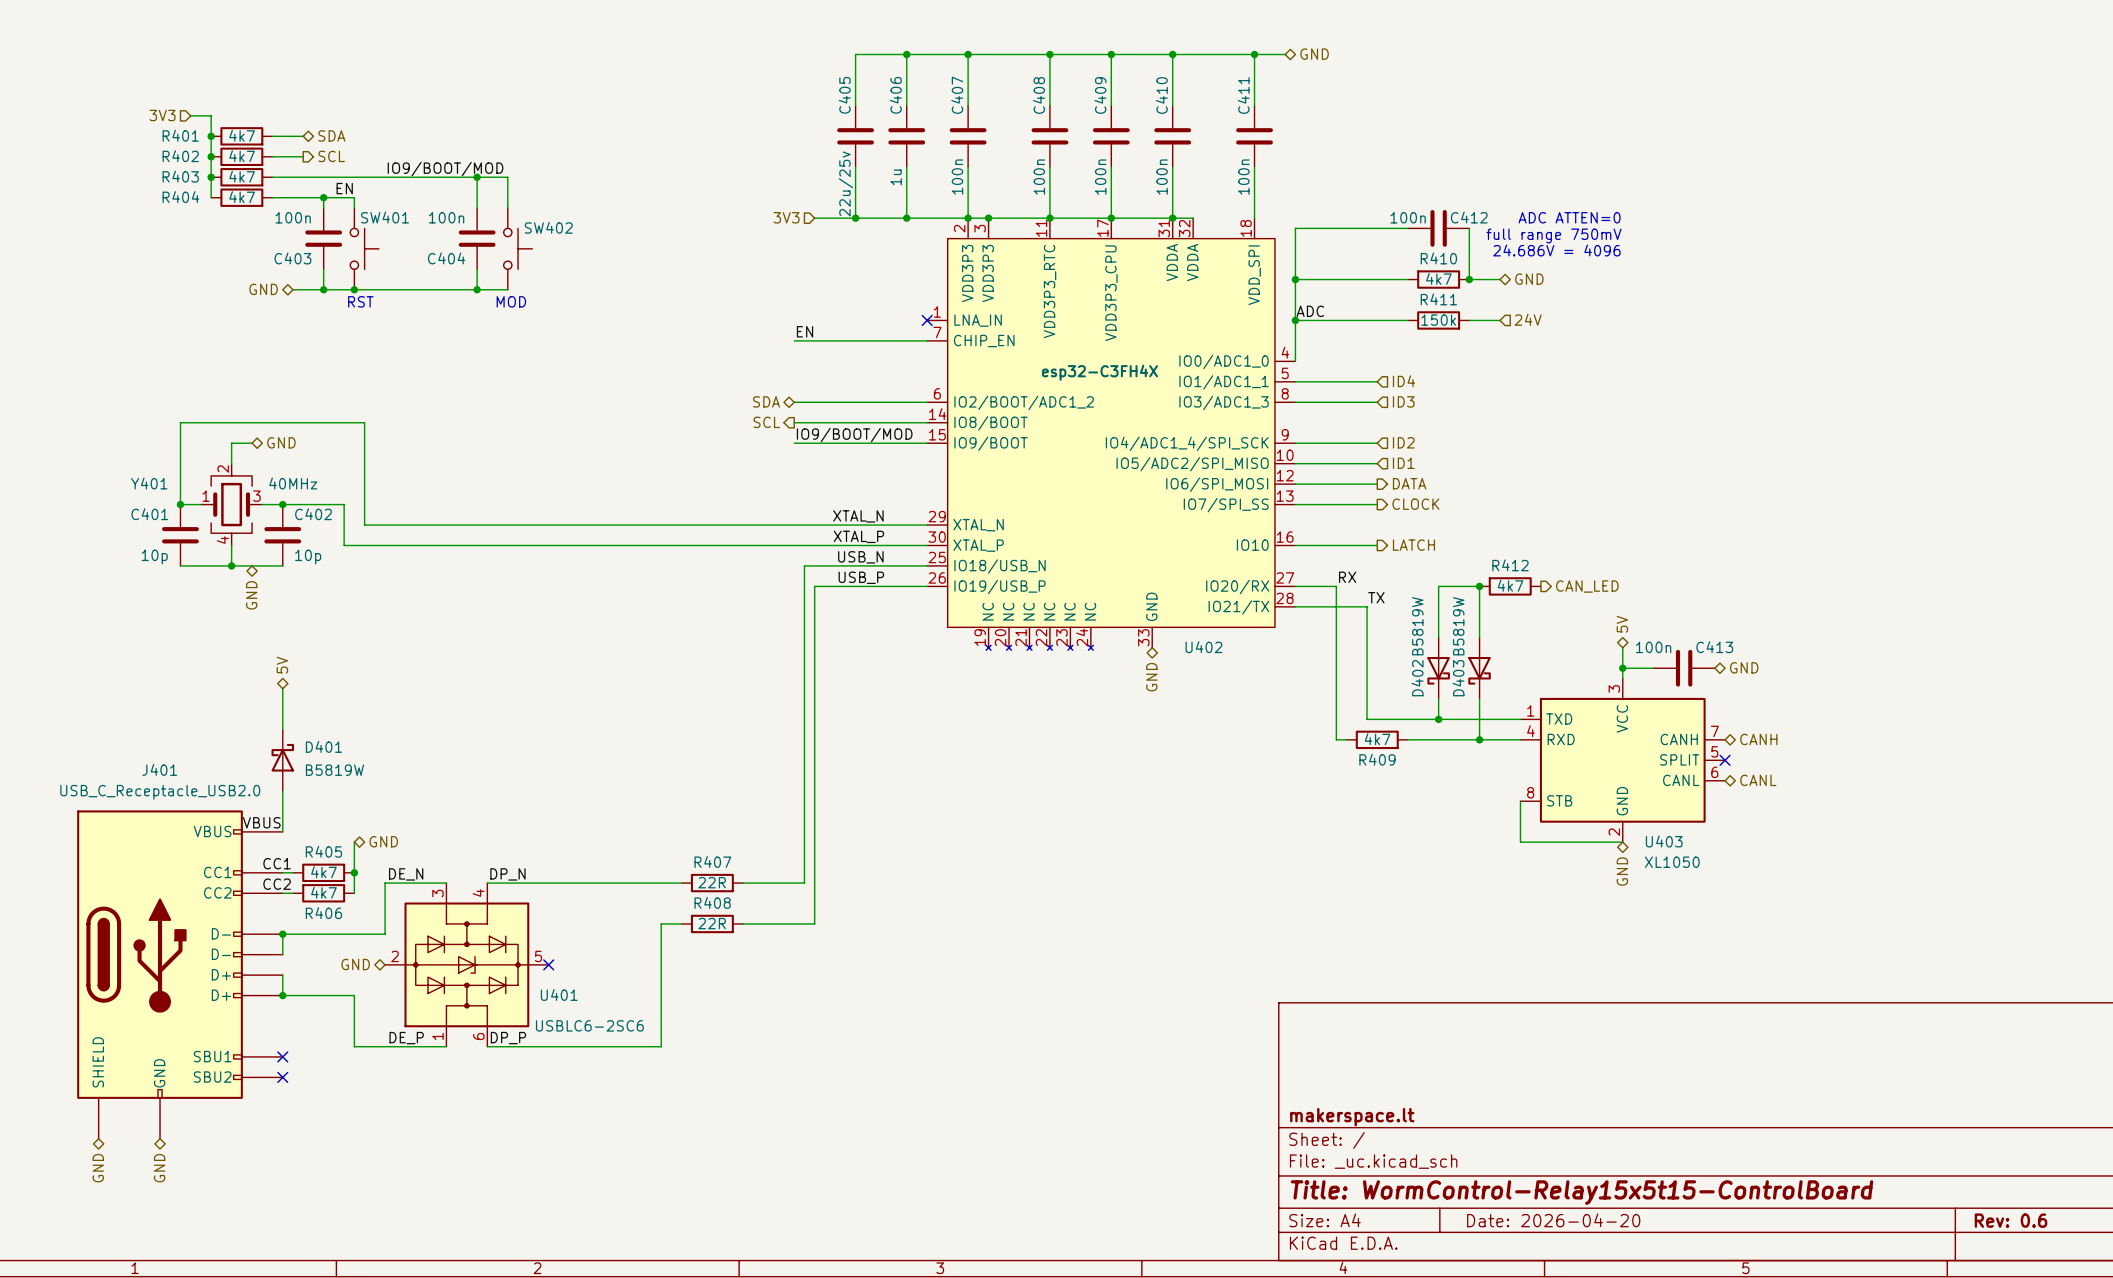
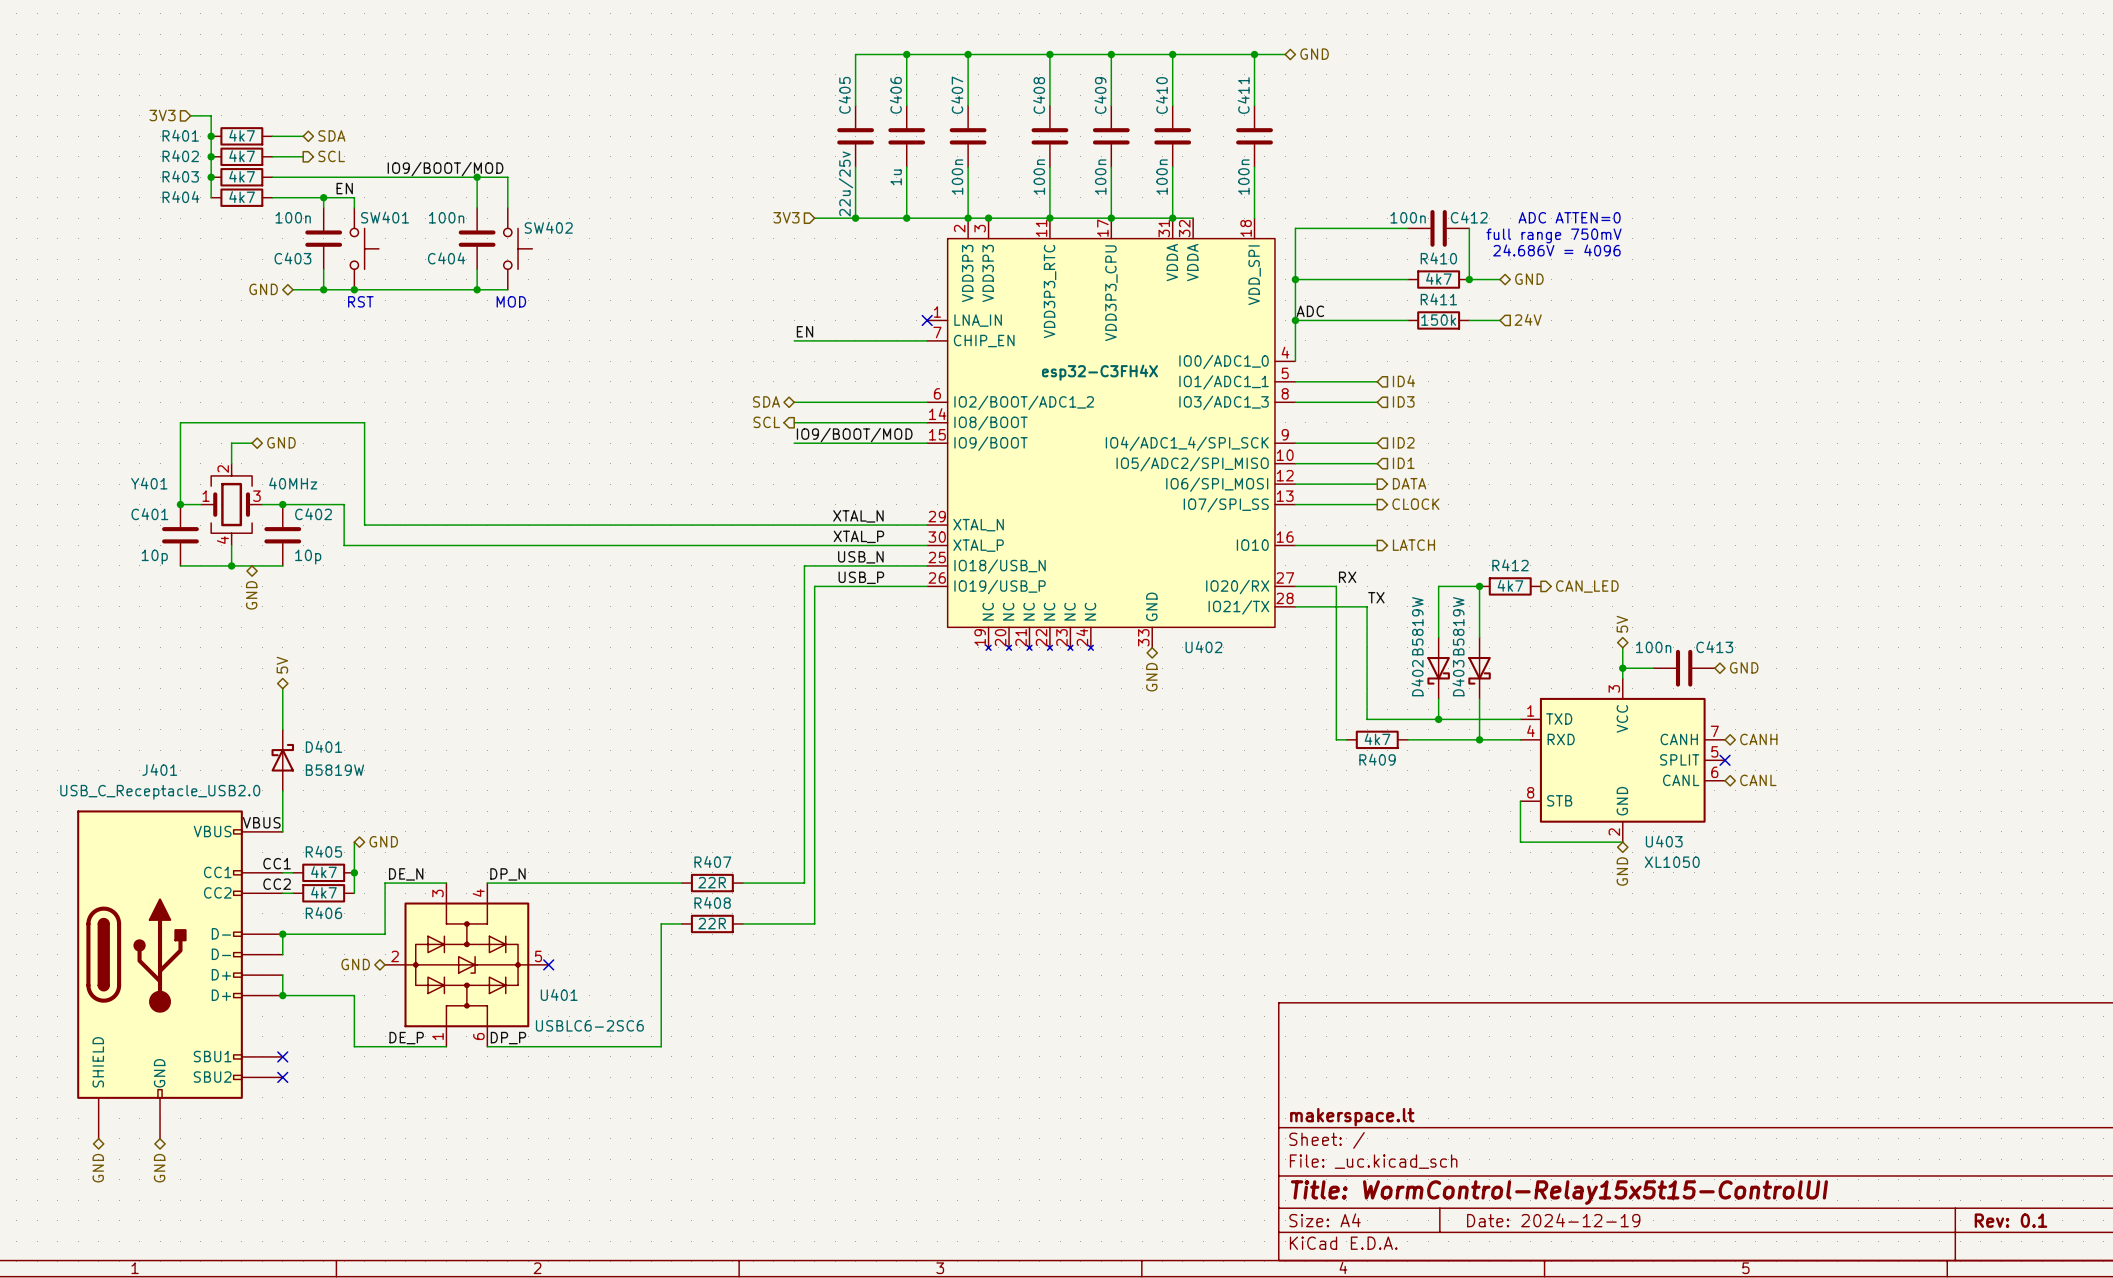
title block: Title: WormControl-Relay15x5t15-ControlBoard (1582, 1192) -> Title: WormControl-Relay15x5t15-ControlUI (1559, 1192)
title block: Date: 2026-04-20 (1553, 1220) -> Date: 2024-12-19 (1553, 1220)
title block: Rev: 0.6 (2010, 1220) -> Rev: 0.1 (2010, 1220)

